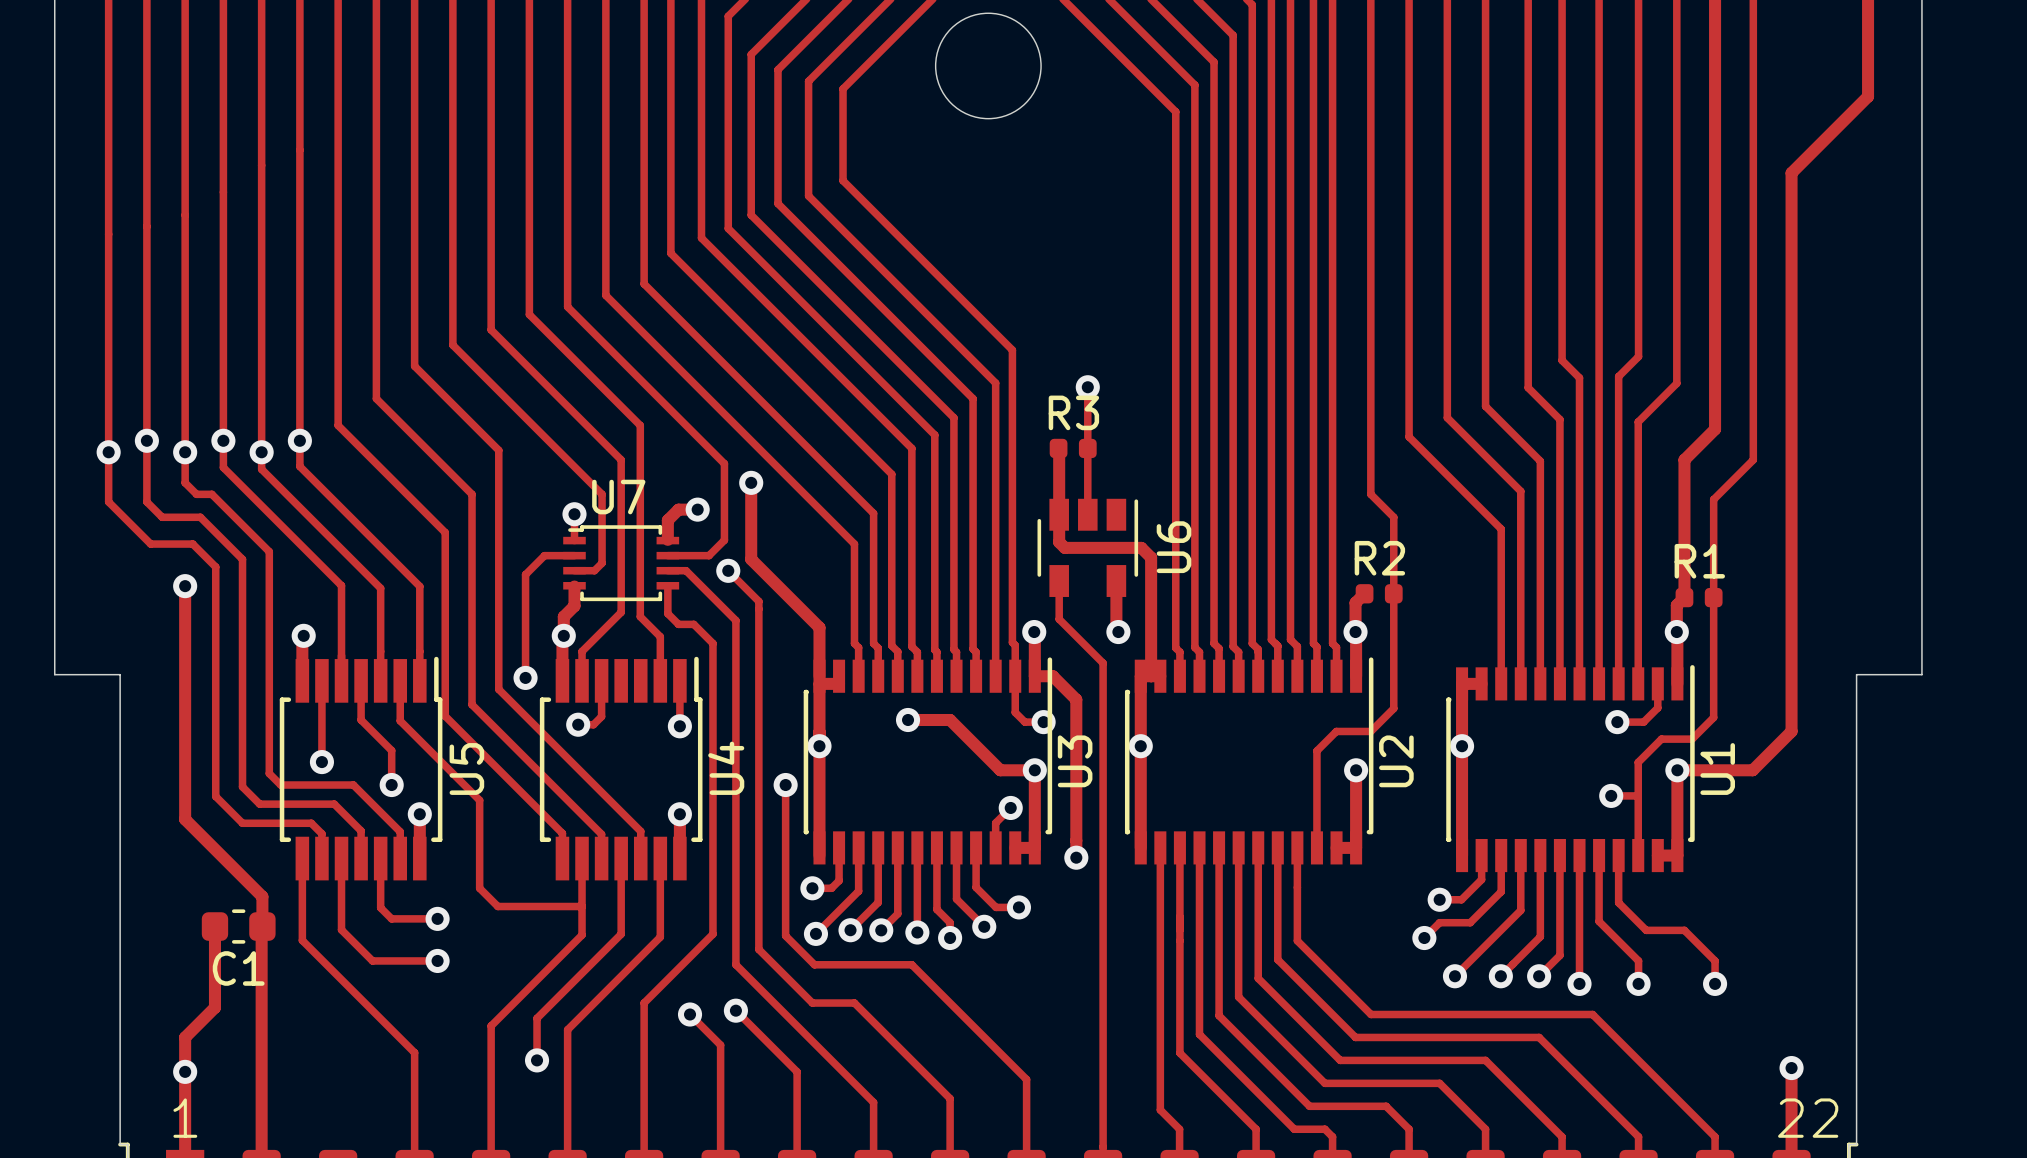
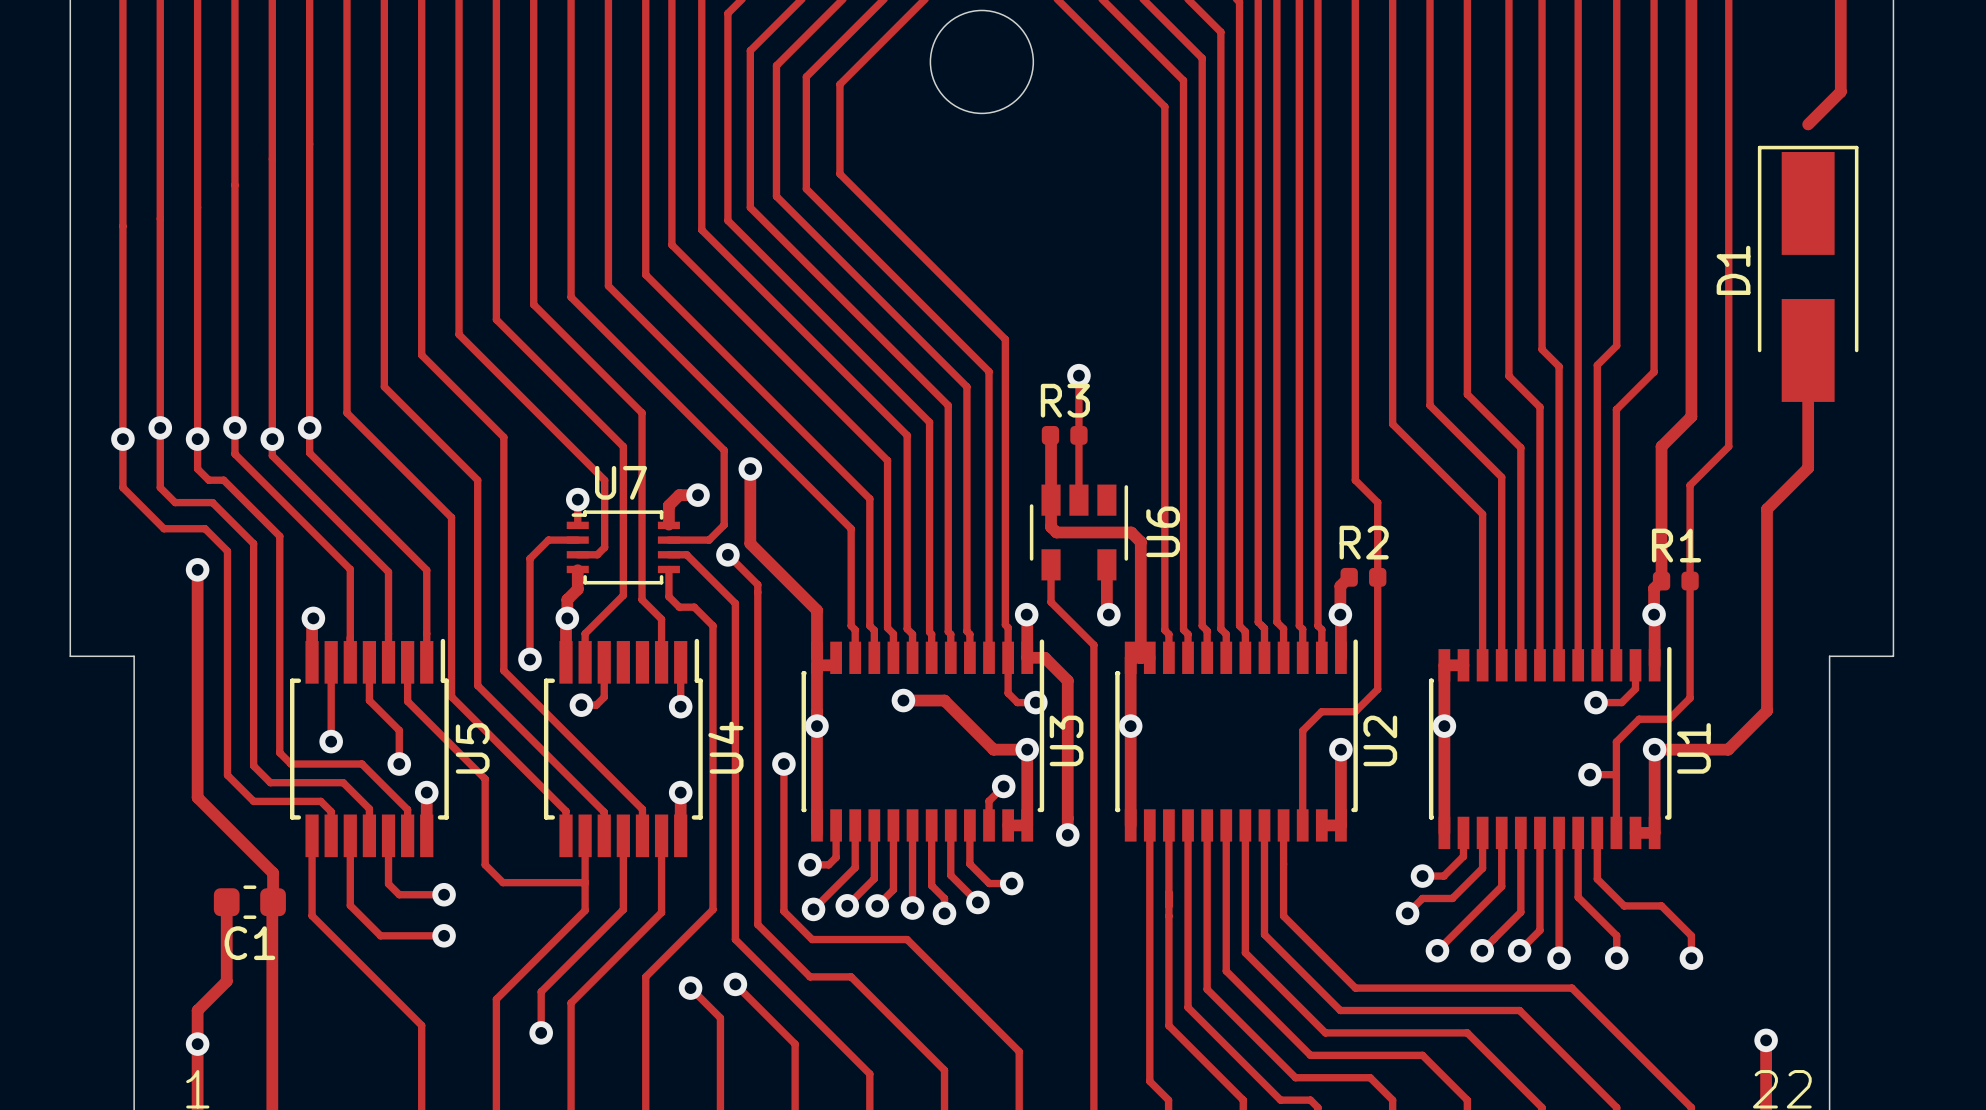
track: (1834, 129) (1791, 173) (1791, 731) -> (1808, 350) (1808, 468) (1766, 509) (1766, 711)
D1: none -> (1808, 273)

